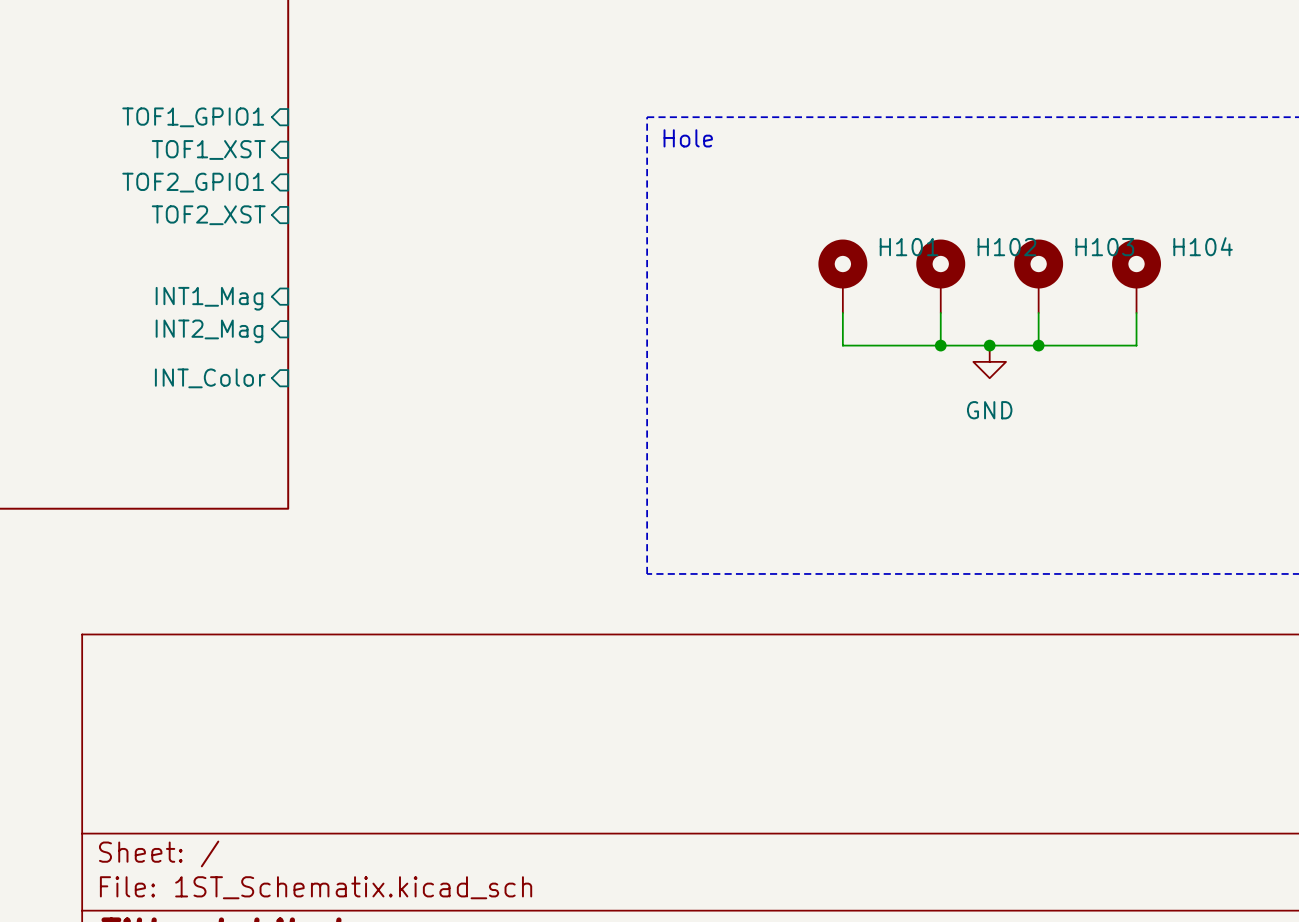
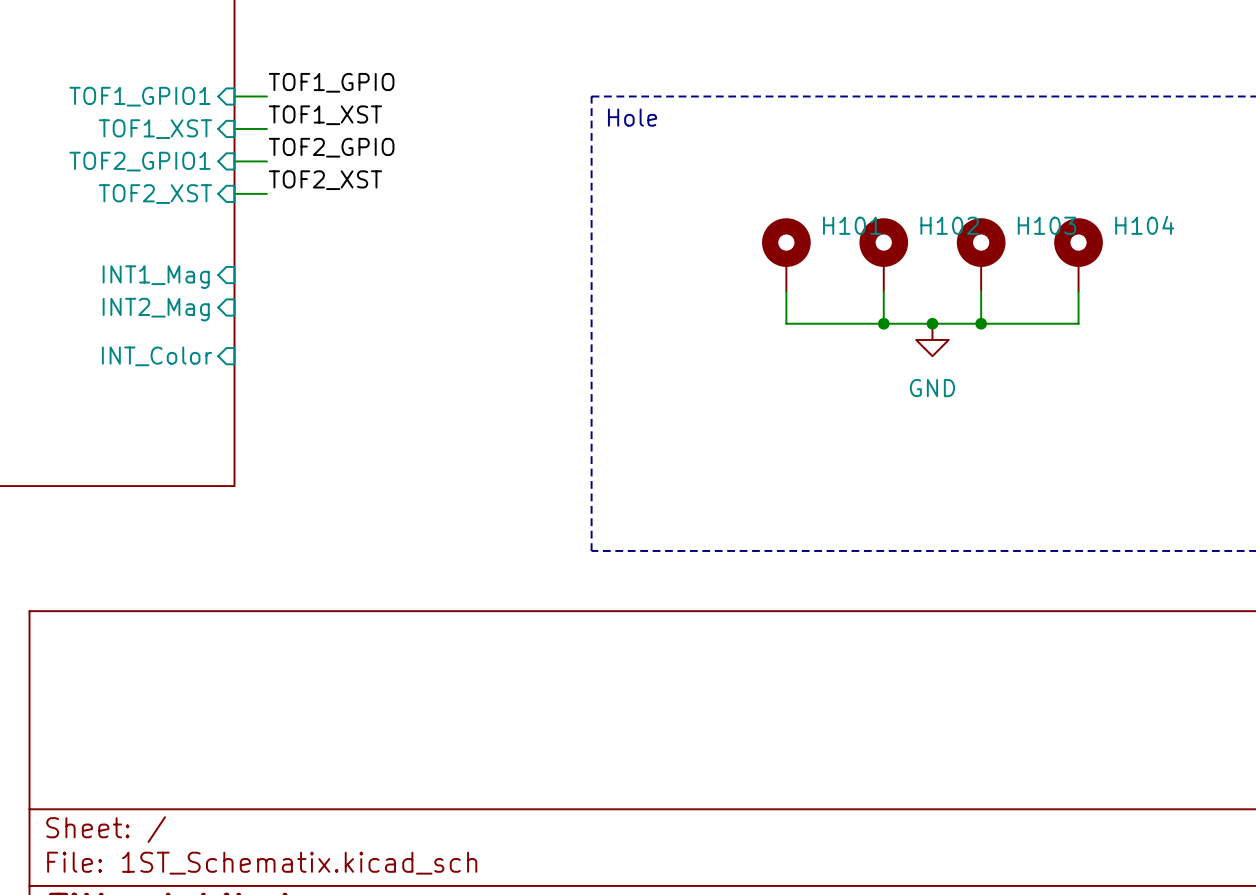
label: none -> TOF1_GPIO (331, 82)
wire: none -> (234, 96) (266, 96)
label: none -> TOF1_XST (325, 115)
wire: none -> (234, 128) (266, 128)
label: none -> TOF2_GPIO (331, 147)
wire: none -> (234, 161) (266, 161)
label: none -> TOF2_XST (325, 180)
wire: none -> (234, 193) (266, 193)

